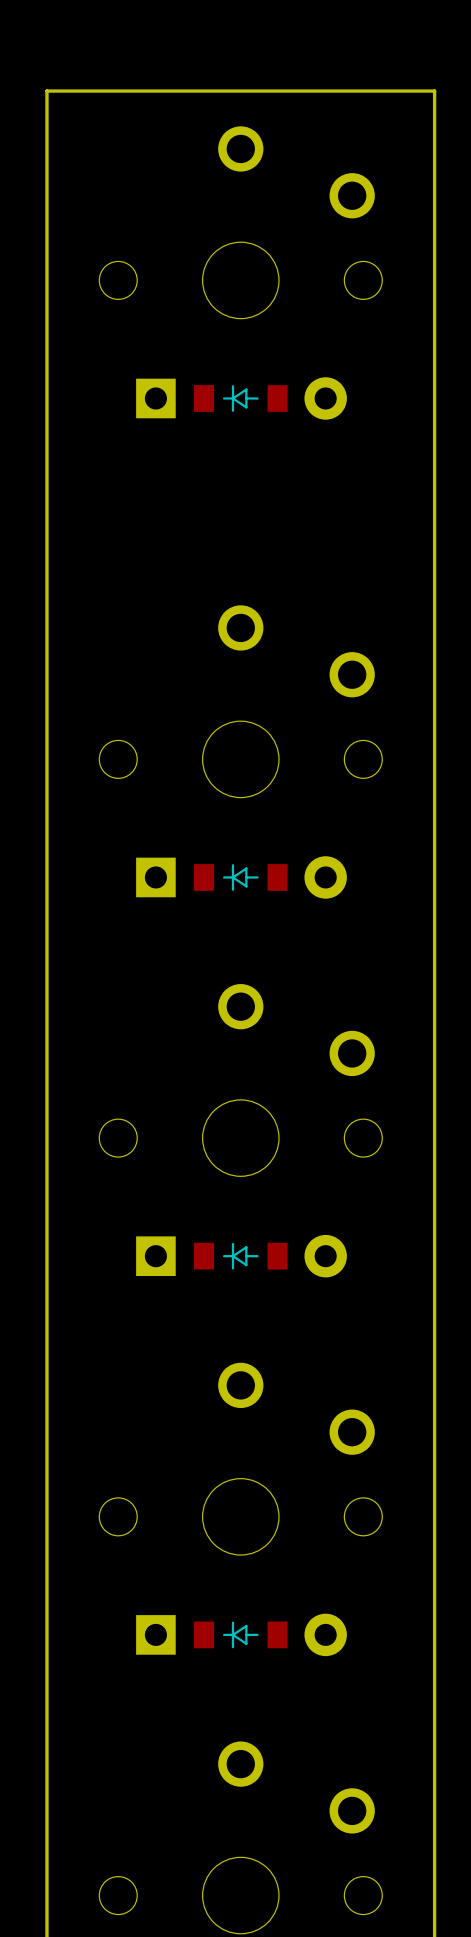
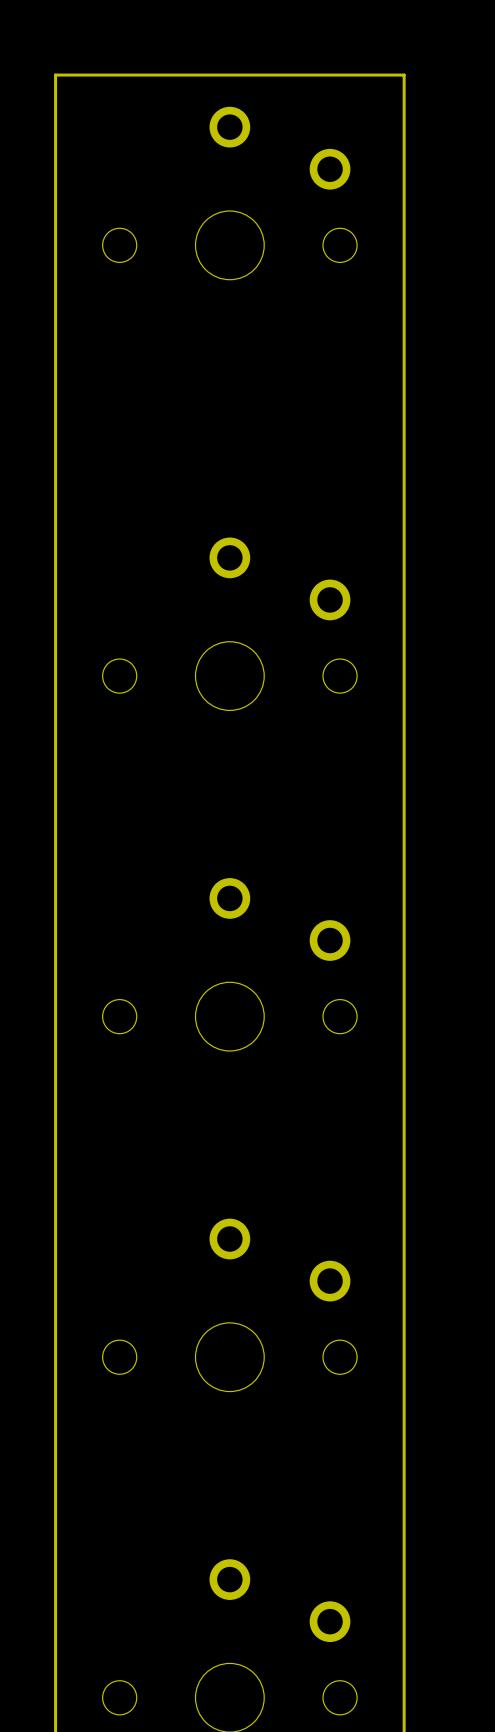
part: (241, 398) -> none
part: (241, 877) -> none
part: (241, 1256) -> none
part: (241, 1634) -> none

